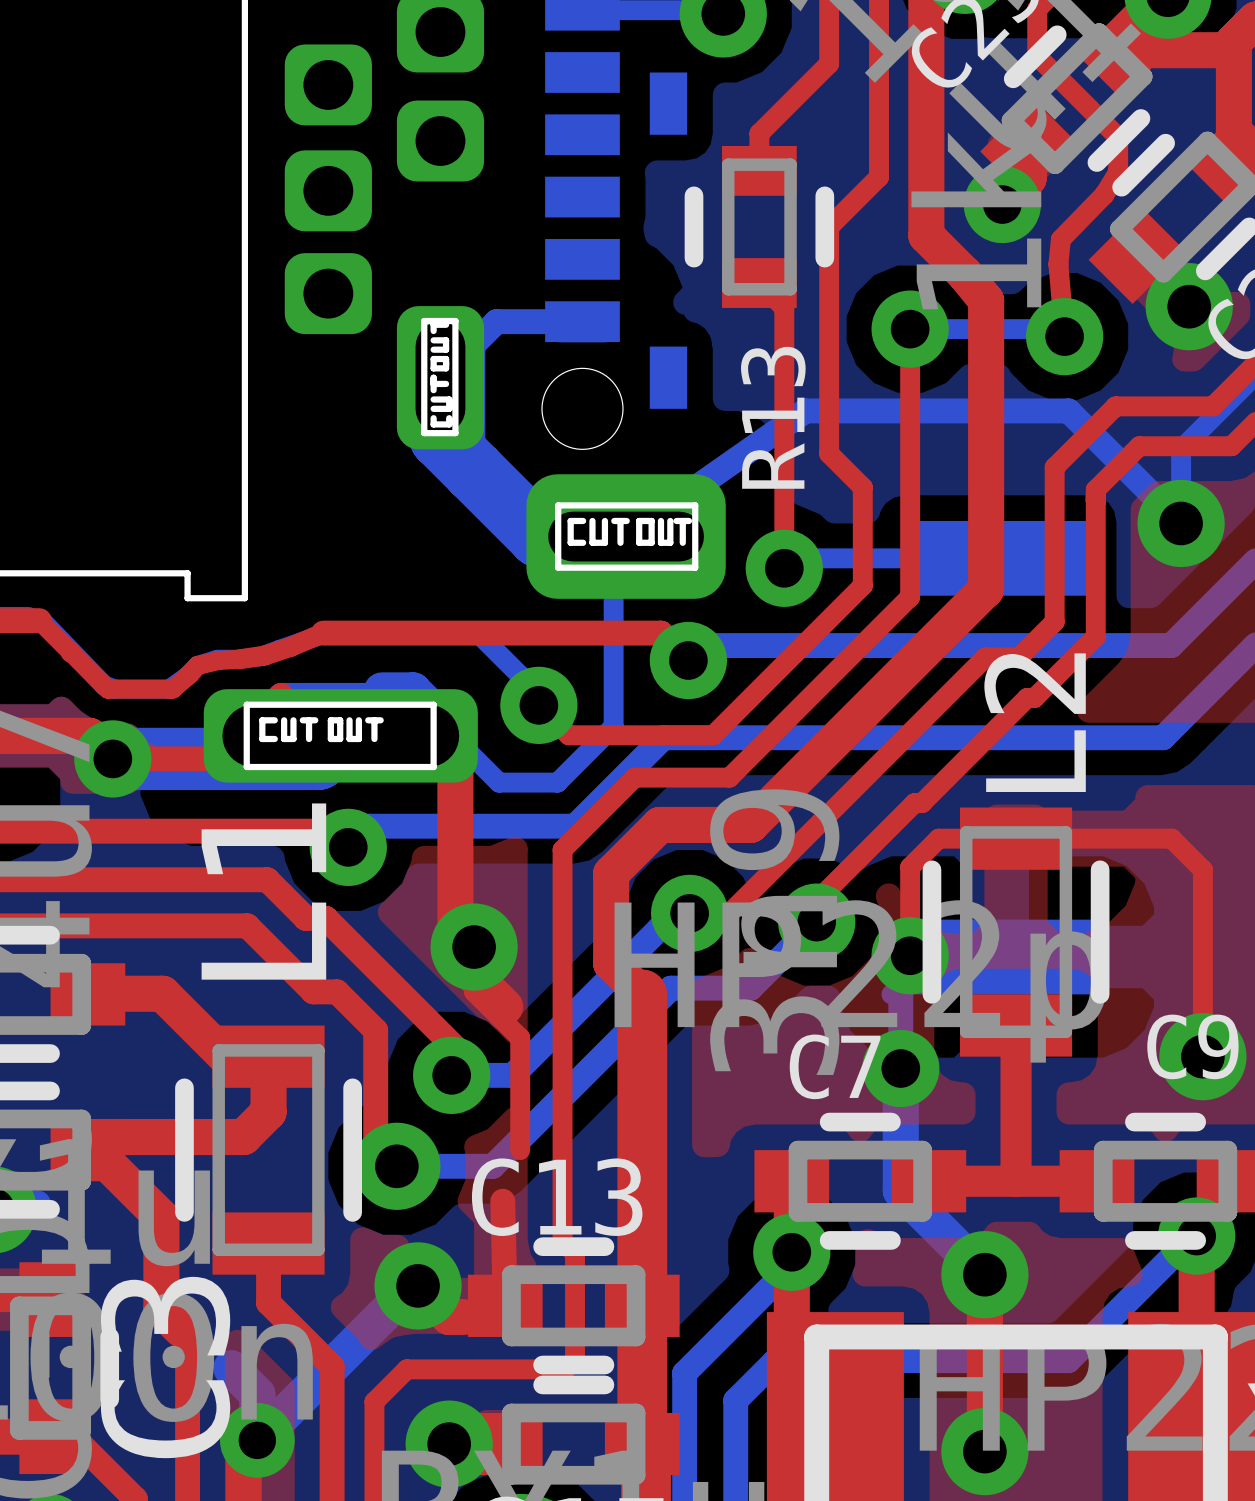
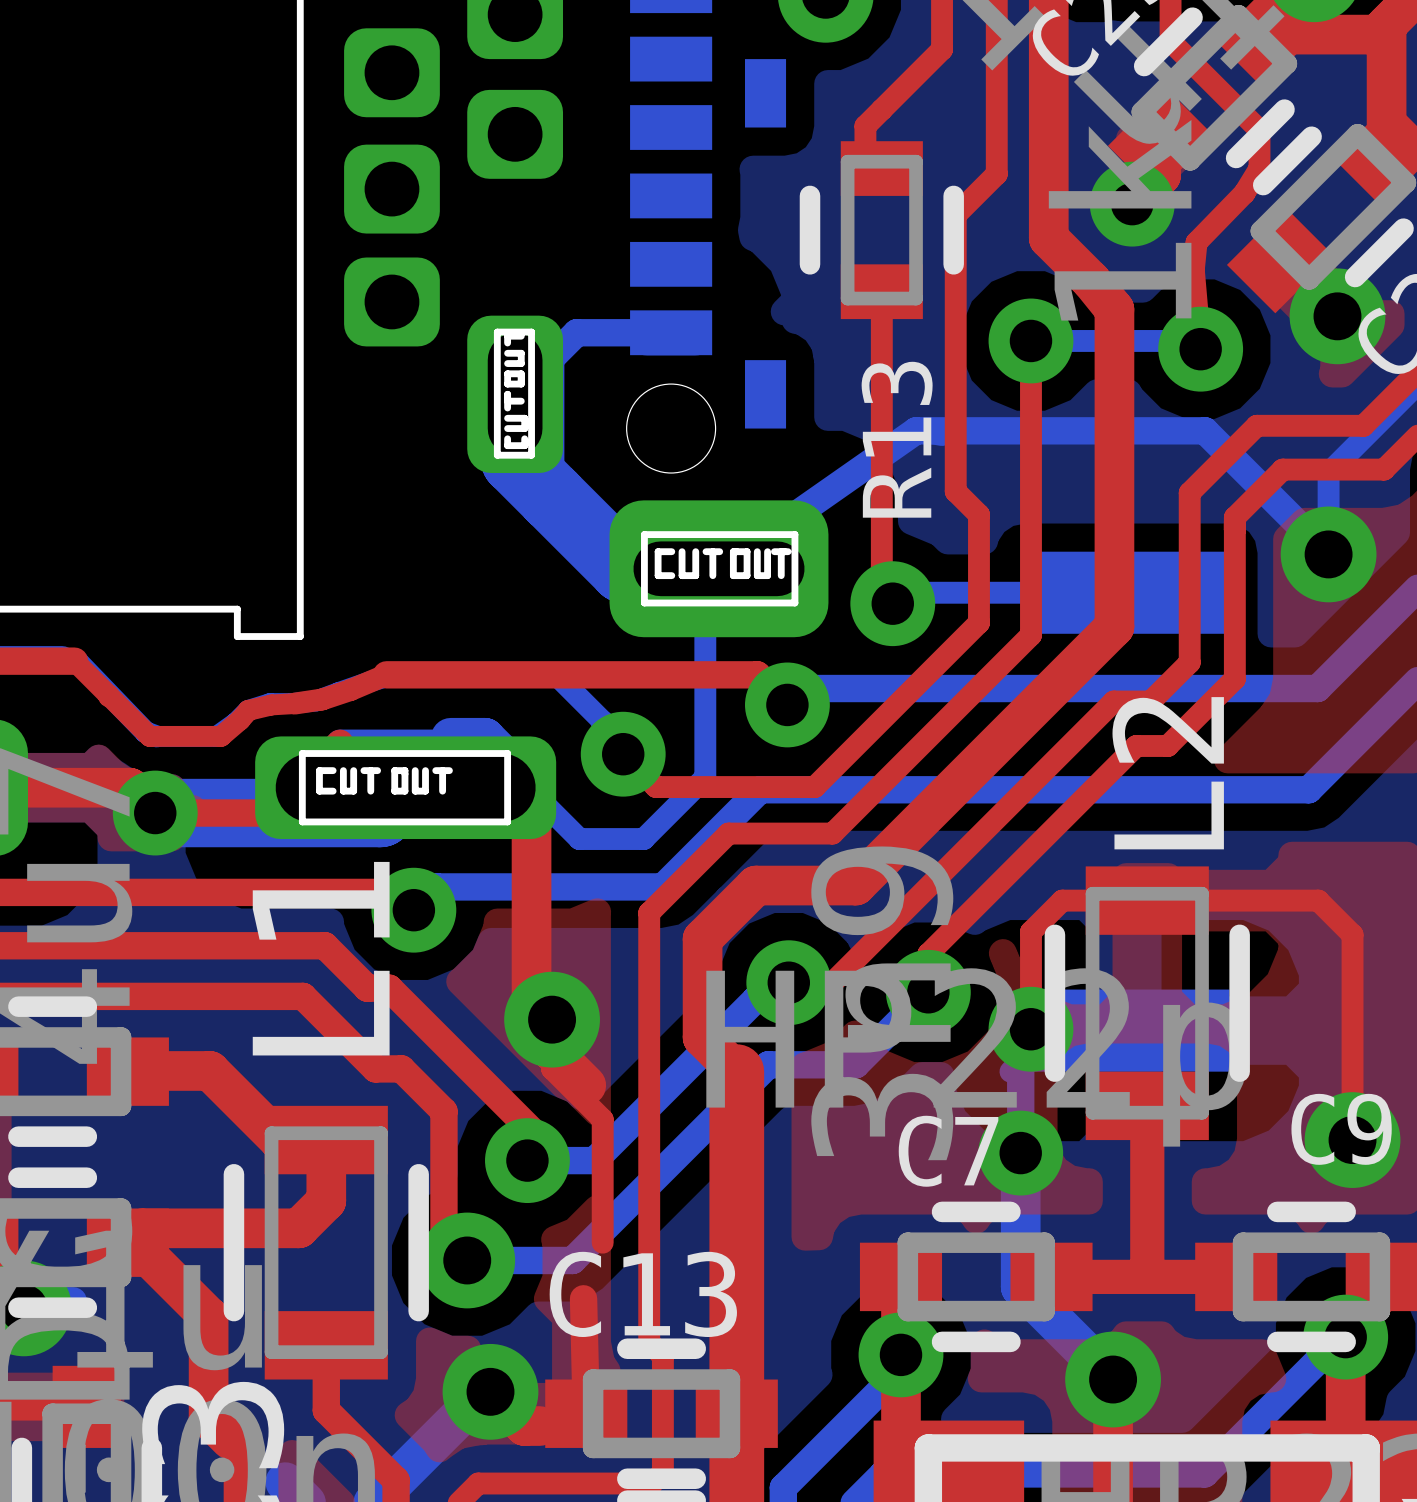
top track: (841, 214) (829, 226) (829, 453) (841, 466) -> (955, 215) (955, 491)
R13 position: (759, 226) -> (881, 230)
top track: (759, 283) (784, 307) (784, 568) -> (881, 291) (881, 592) (892, 603)
top track: (1027, 697) (921, 803) (914, 803) (816, 900) -> (1159, 745) (1136, 745) (928, 953) (928, 969)

